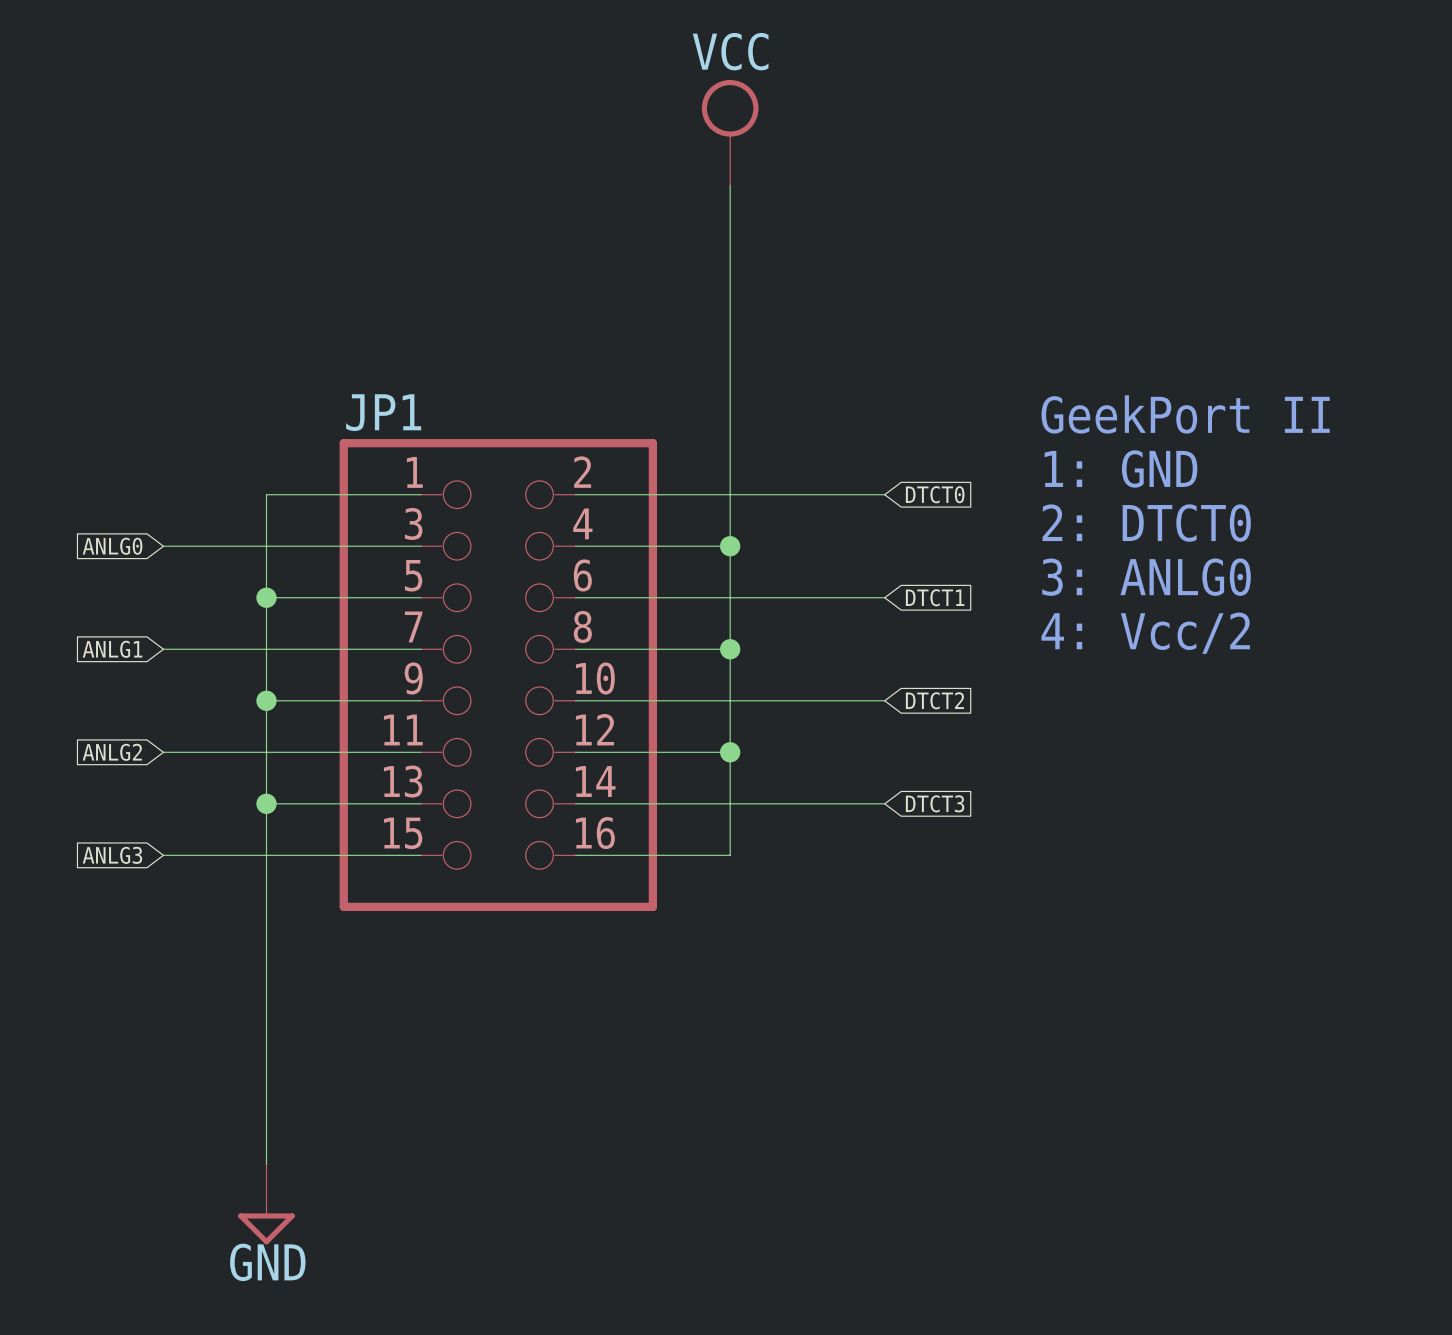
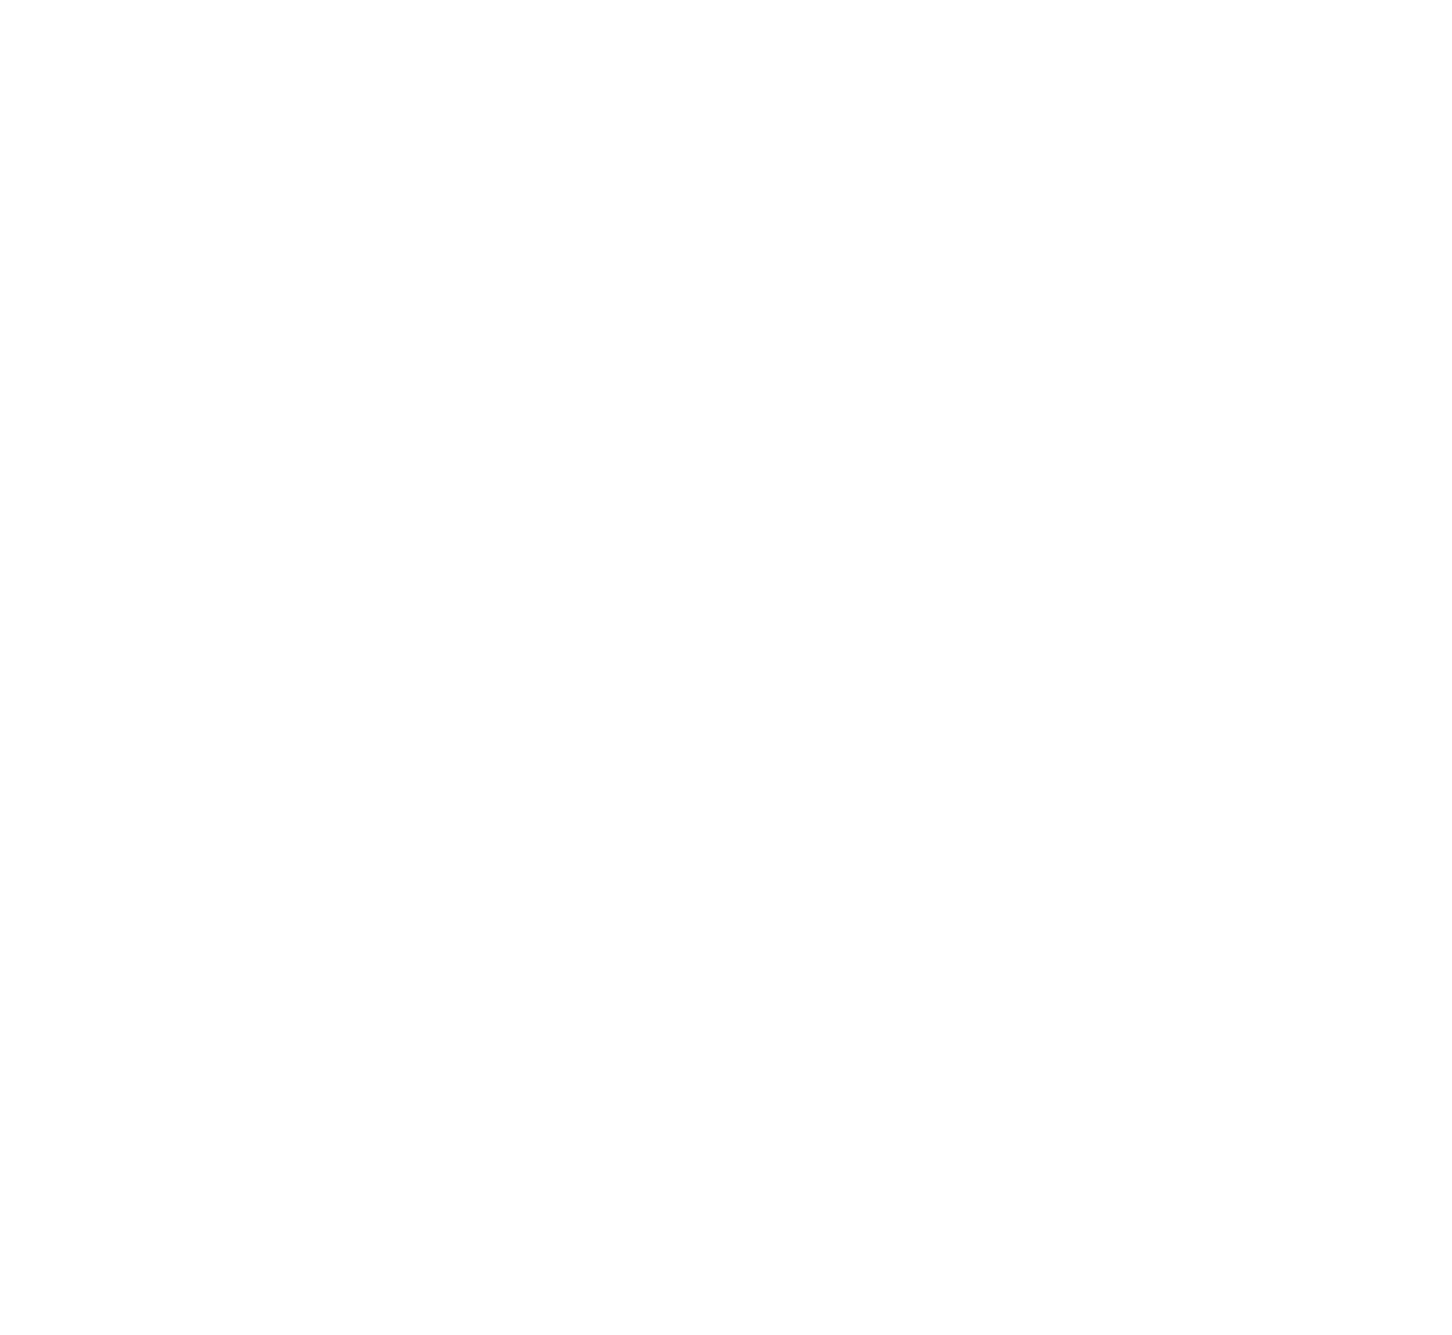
power symbol: VCC (730, 132) -> none
wire: (730, 185) (730, 855) (575, 855) -> none
text: GeekPort II (1185, 414) -> none
text: 1: GND (1120, 468) -> none
wire: (421, 494) (266, 494) (266, 1164) -> none
wire: (575, 494) (884, 494) -> none
global label: DTCT0 (935, 494) -> none
text: 2: DTCT0 (1146, 523) -> none
global label: ANLG0 (112, 546) -> none
wire: (163, 546) (421, 546) -> none
wire: (575, 546) (730, 546) -> none
junction: (730, 546) -> none
text: 3: ANLG0 (1146, 577) -> none
wire: (266, 597) (421, 597) -> none
junction: (266, 597) -> none
wire: (575, 597) (884, 597) -> none
global label: DTCT1 (935, 597) -> none
text: 4: Vcc/2 (1145, 633) -> none
global label: ANLG1 (112, 649) -> none
wire: (163, 649) (421, 649) -> none
wire: (575, 649) (730, 649) -> none
junction: (730, 649) -> none
JP1: (498, 675) -> none
wire: (266, 700) (421, 700) -> none
junction: (266, 700) -> none
wire: (575, 700) (884, 700) -> none
global label: DTCT2 (934, 700) -> none
global label: ANLG2 (112, 752) -> none
wire: (163, 752) (421, 752) -> none
wire: (575, 752) (730, 752) -> none
junction: (730, 752) -> none
wire: (266, 803) (421, 803) -> none
junction: (266, 803) -> none
wire: (575, 803) (884, 803) -> none
global label: DTCT3 (935, 803) -> none
global label: ANLG3 (112, 855) -> none
wire: (163, 855) (421, 855) -> none
power symbol: GND (266, 1204) -> none

